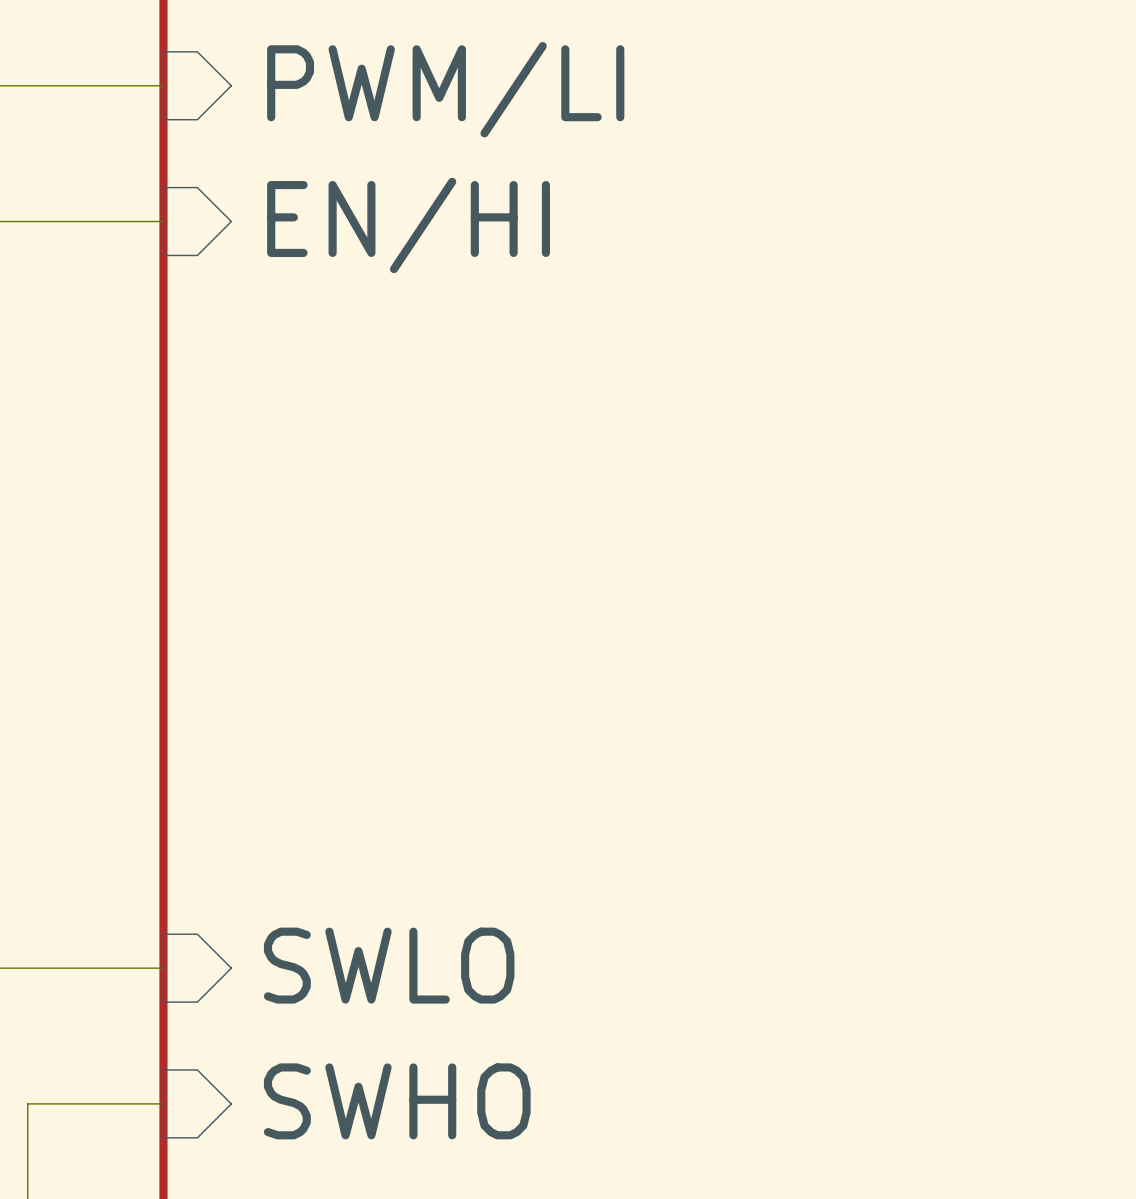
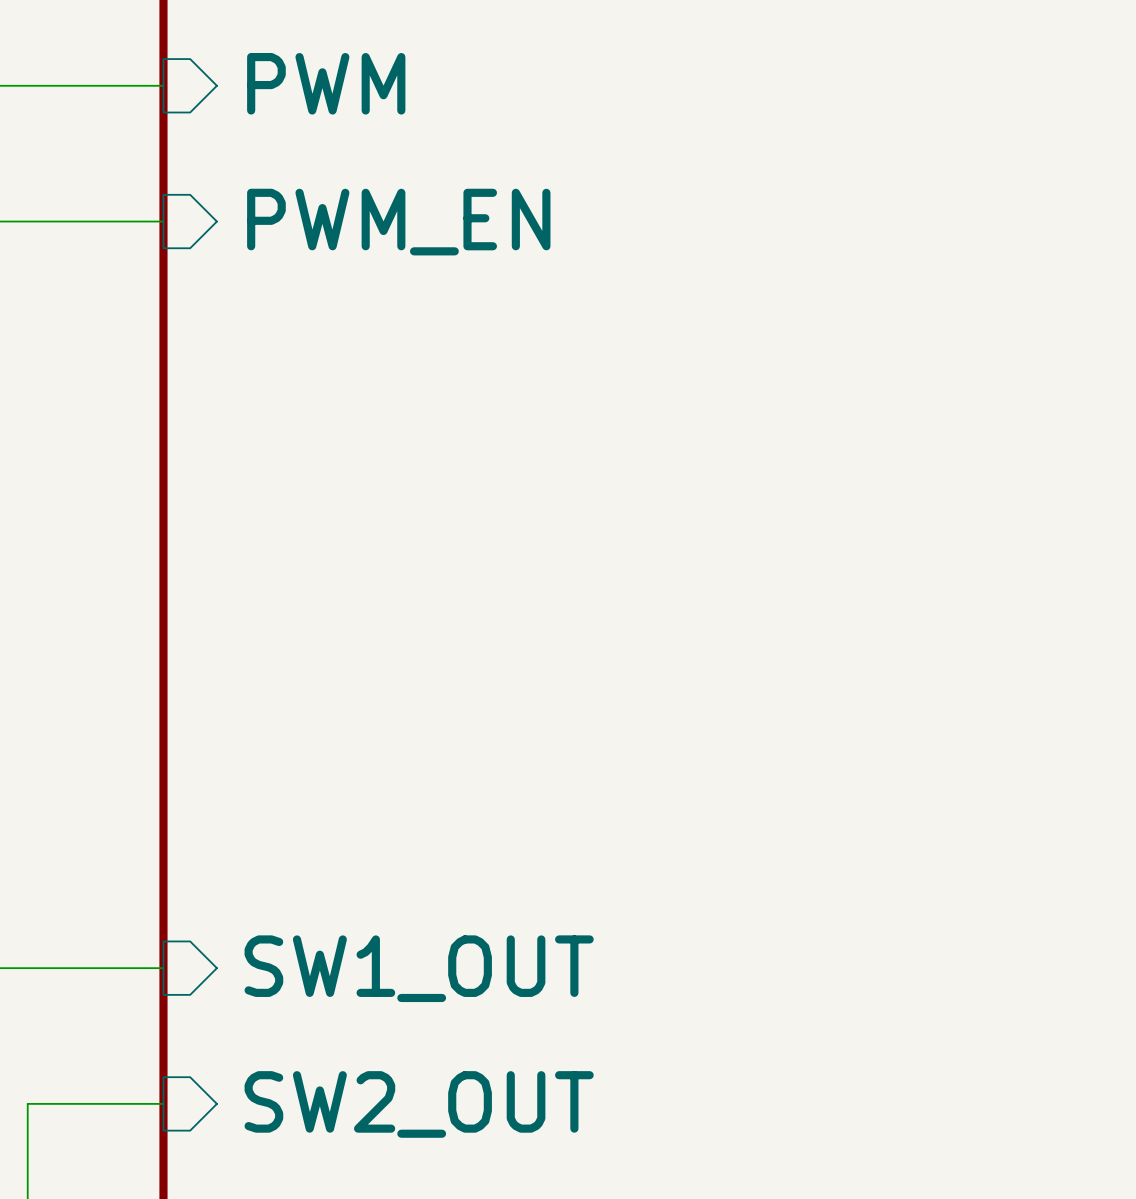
sheet pin: PWM/LI (445, 89) -> PWM (326, 83)
sheet pin: EN/HI (408, 225) -> PWM_EN (398, 222)
sheet pin: SWLO (389, 965) -> SW1_OUT (419, 968)
sheet pin: SWHO (397, 1101) -> SW2_OUT (419, 1104)

